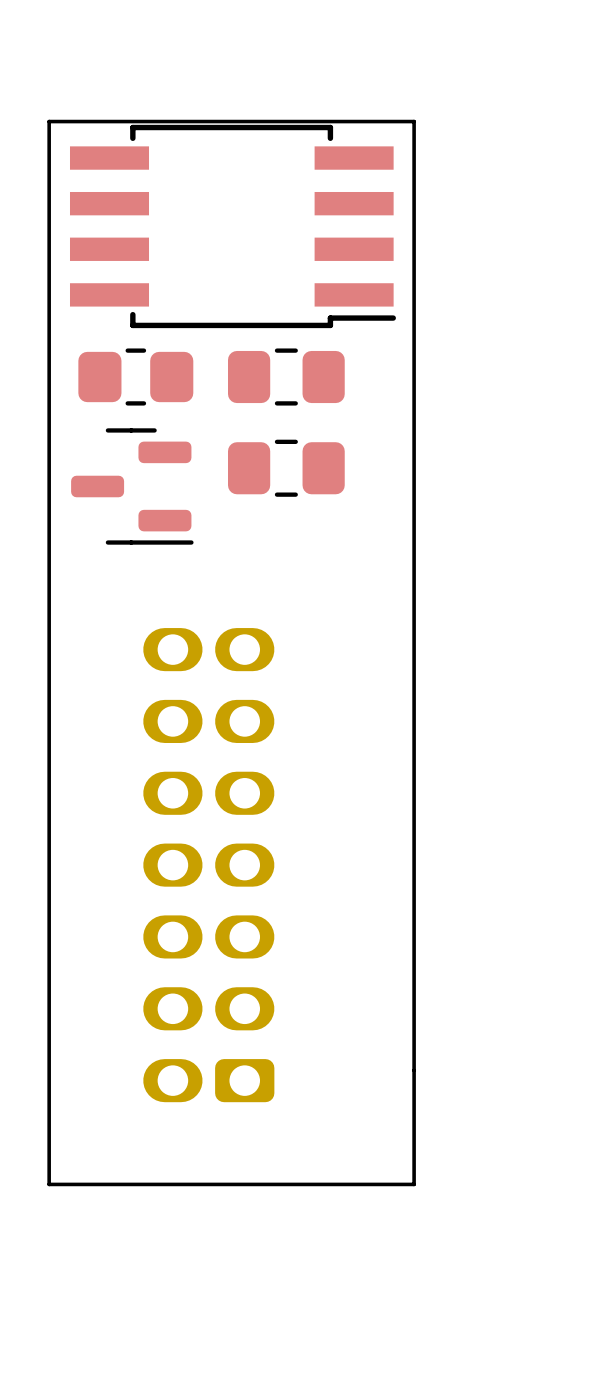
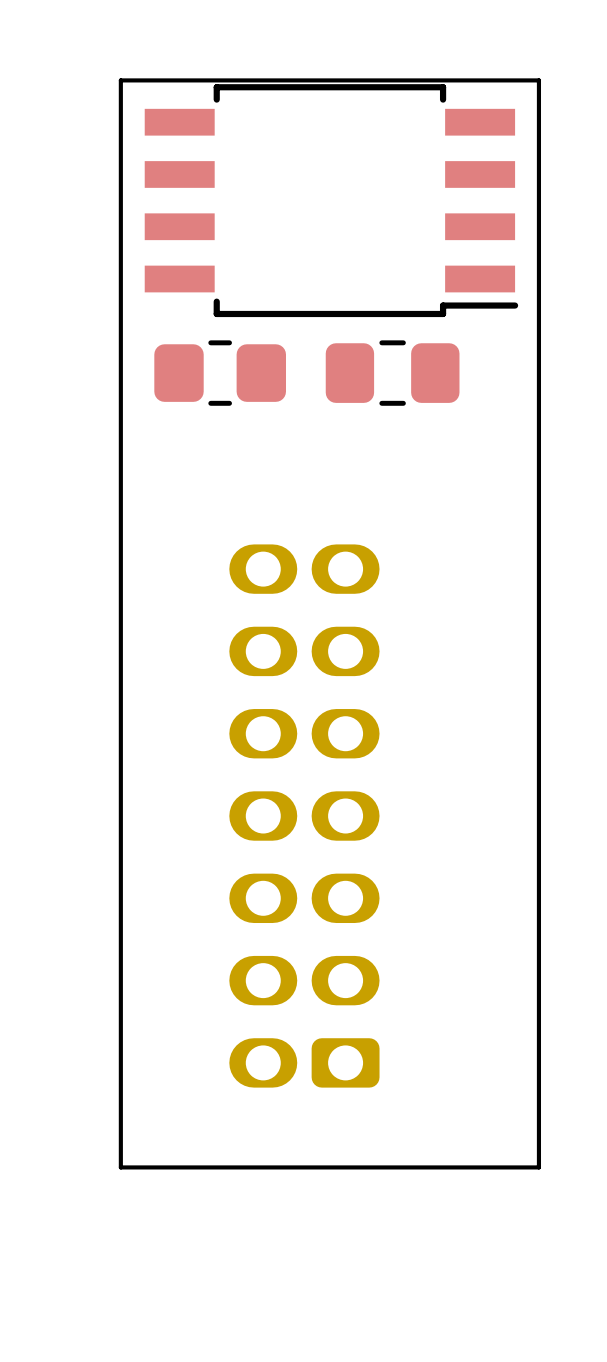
part footprint: [69, 124, 396, 329] -> [144, 84, 519, 318]
part: (286, 468) -> none
part: (132, 486) -> none
part position: (208, 865) -> (304, 816)
board edge: (49, 1070) (49, 1184) (414, 1184) (414, 1070) -> (120, 1167) (538, 1167)

